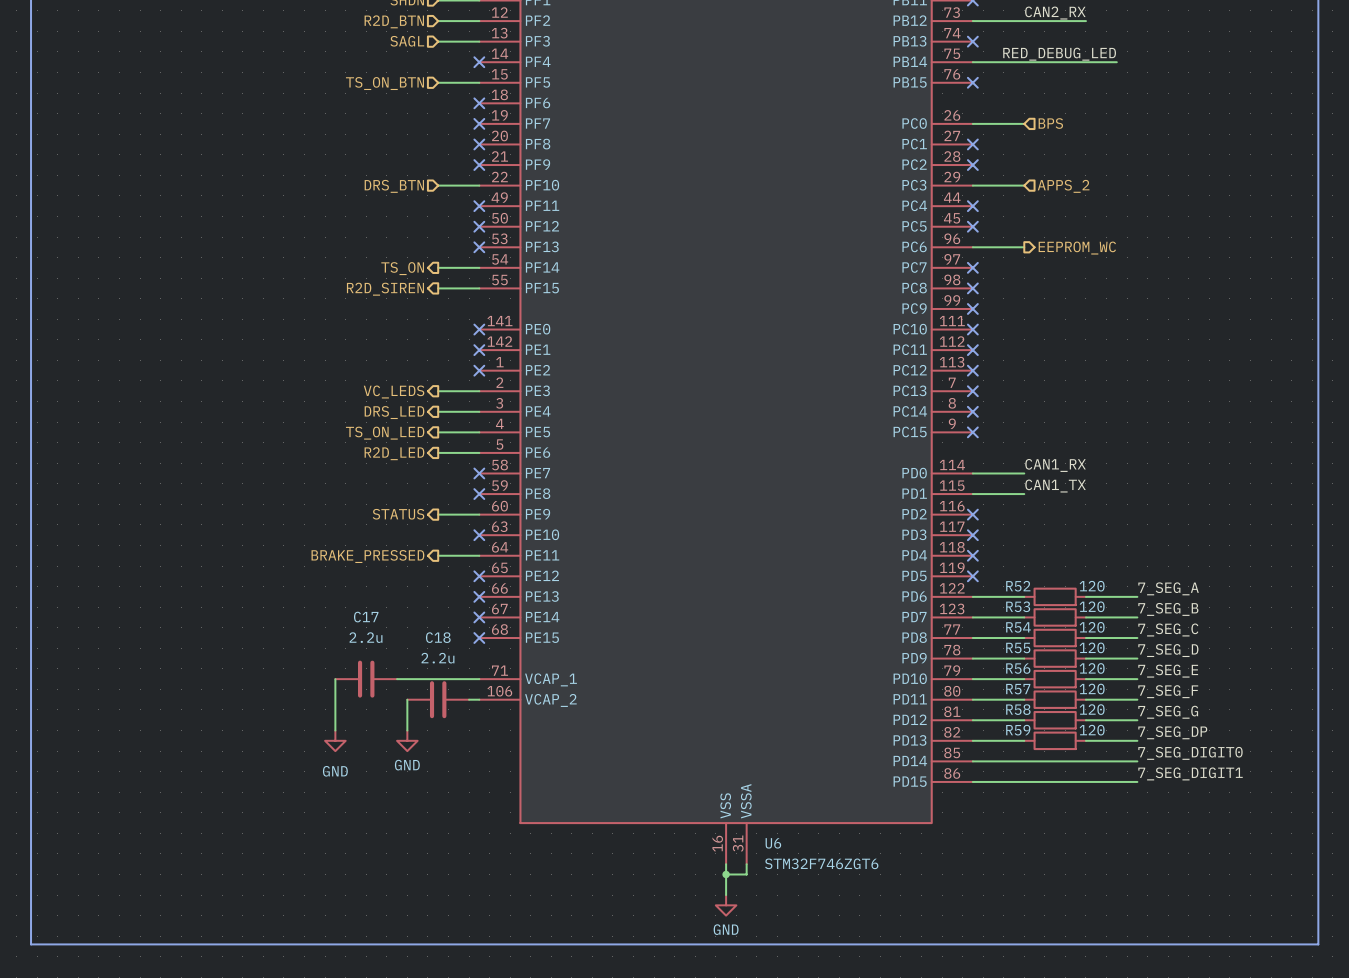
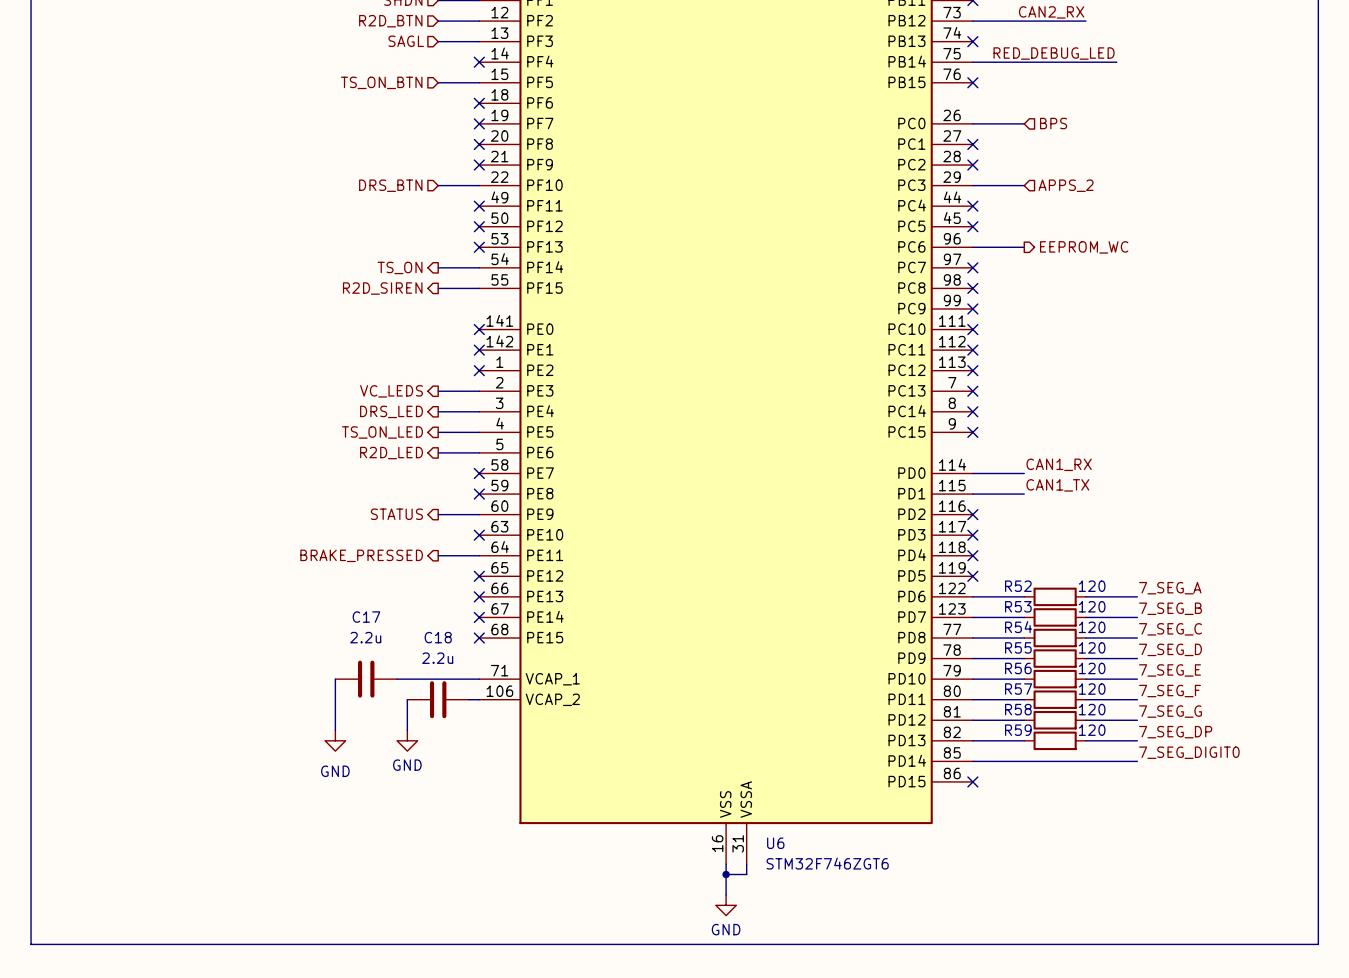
label: 7_SEG_DIGIT1 (1190, 773) -> none
wire: (972, 781) (1137, 781) -> none
no-connect mark: none -> (972, 781)

